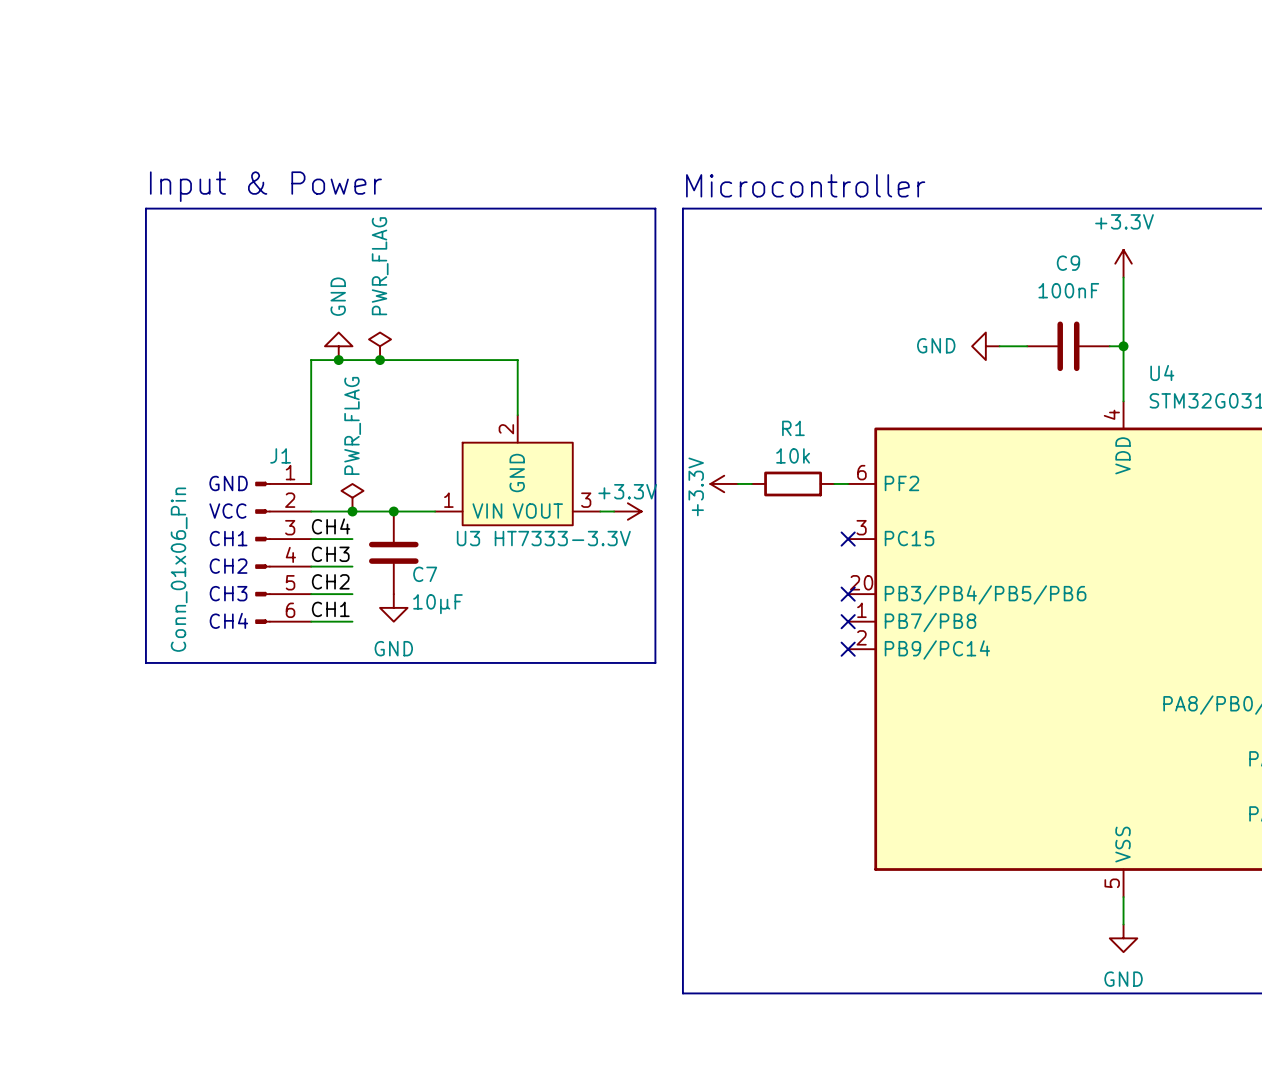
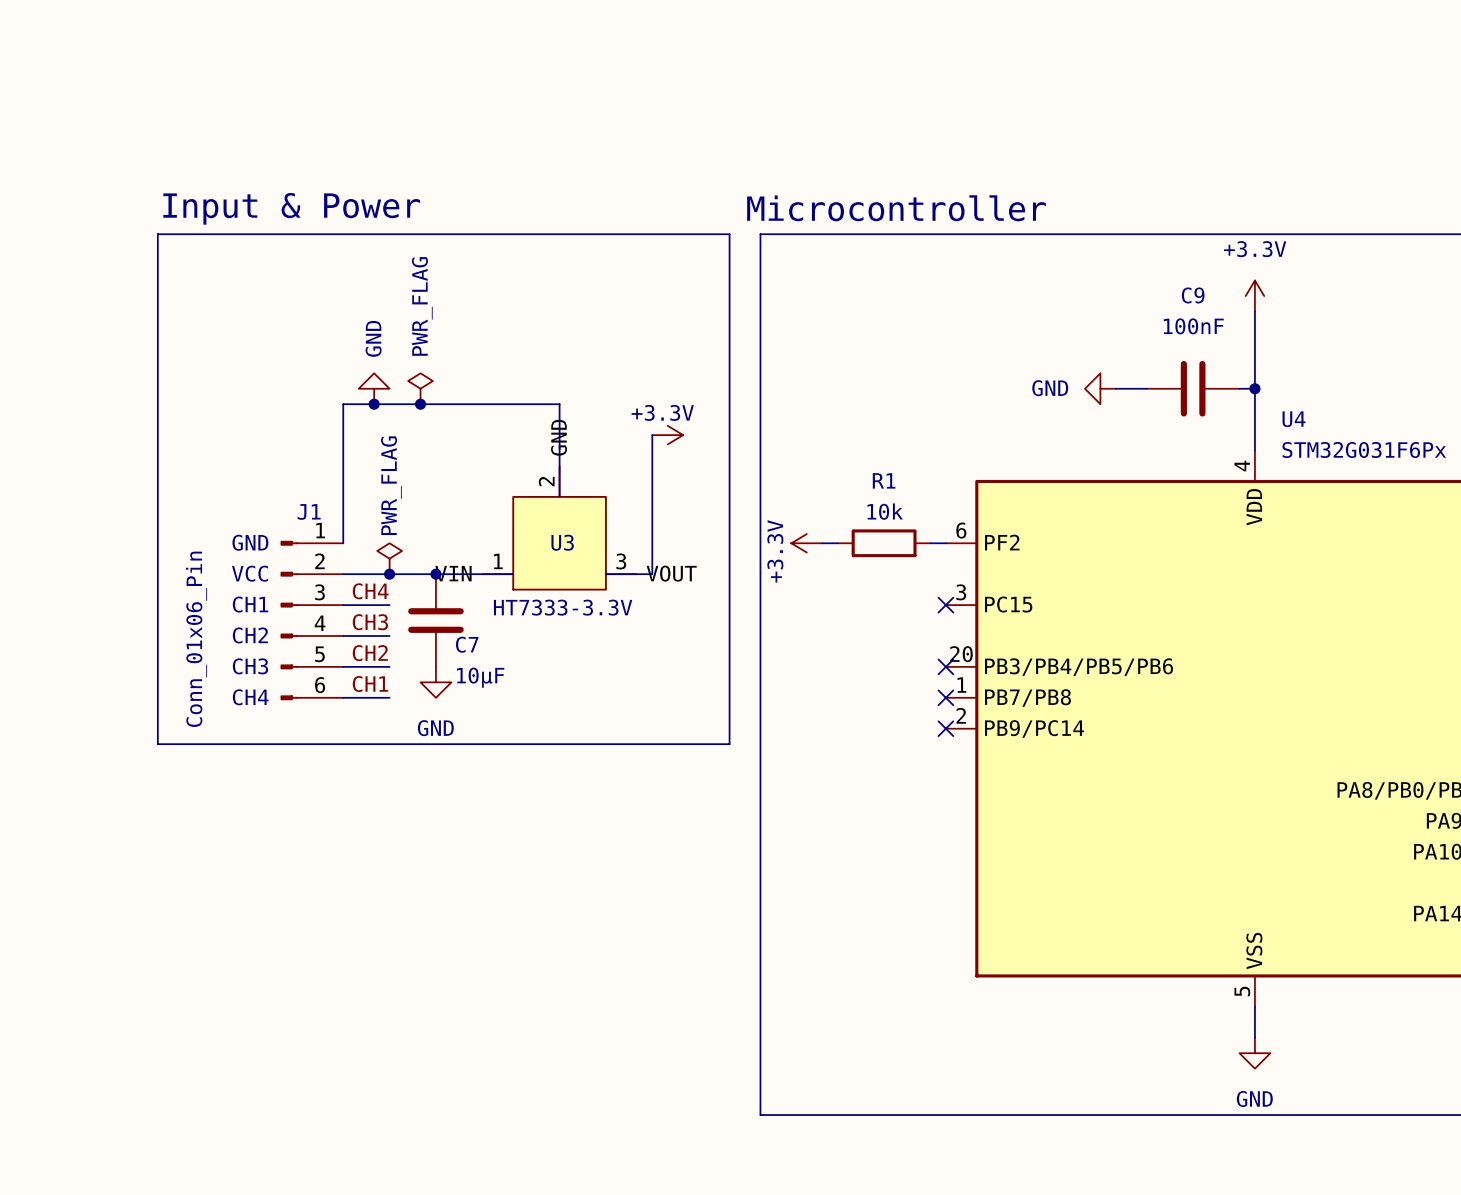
wire: (503, 360) (517, 360) (517, 415) -> (559, 404) (559, 496)
wire: none -> (652, 435) (652, 574) (605, 574)
U3 symbol: [435, 415, 601, 527] -> [482, 466, 637, 591]
wire: (600, 511) (614, 511) -> none
power symbol position: +3.3V (627, 511) -> +3.3V (667, 435)
U3 name position: U3 (468, 538) -> U3 (562, 542)
U3 value position: HT7333-3.3V (562, 538) -> HT7333-3.3V (563, 607)

